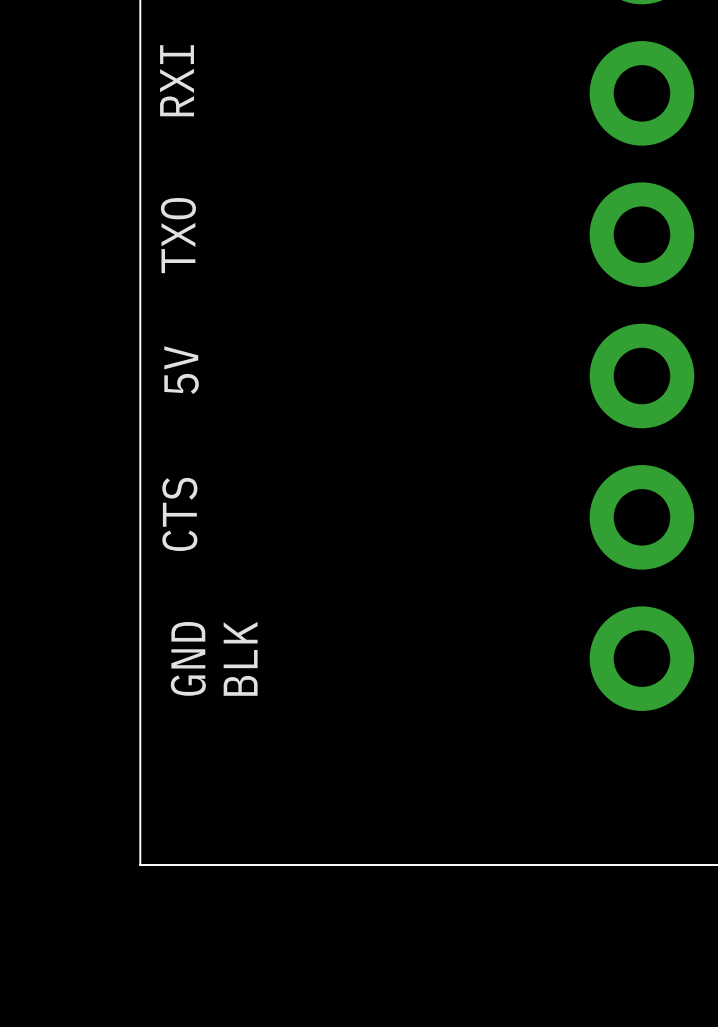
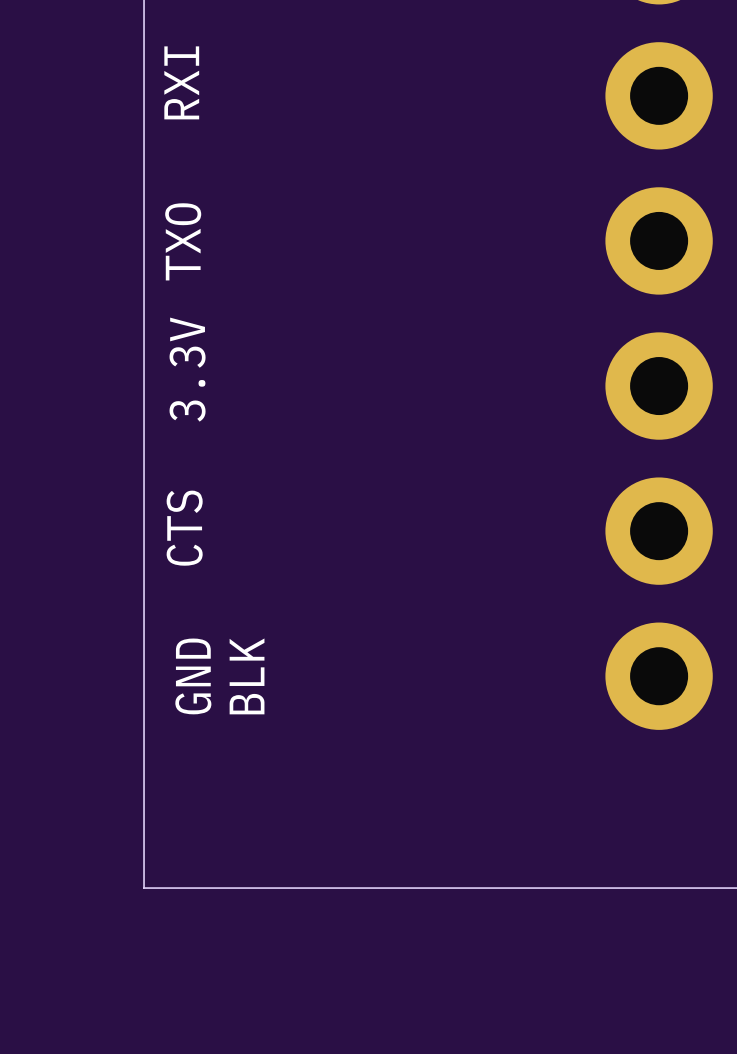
text: 5V (181, 370) -> 3.3V (187, 369)

